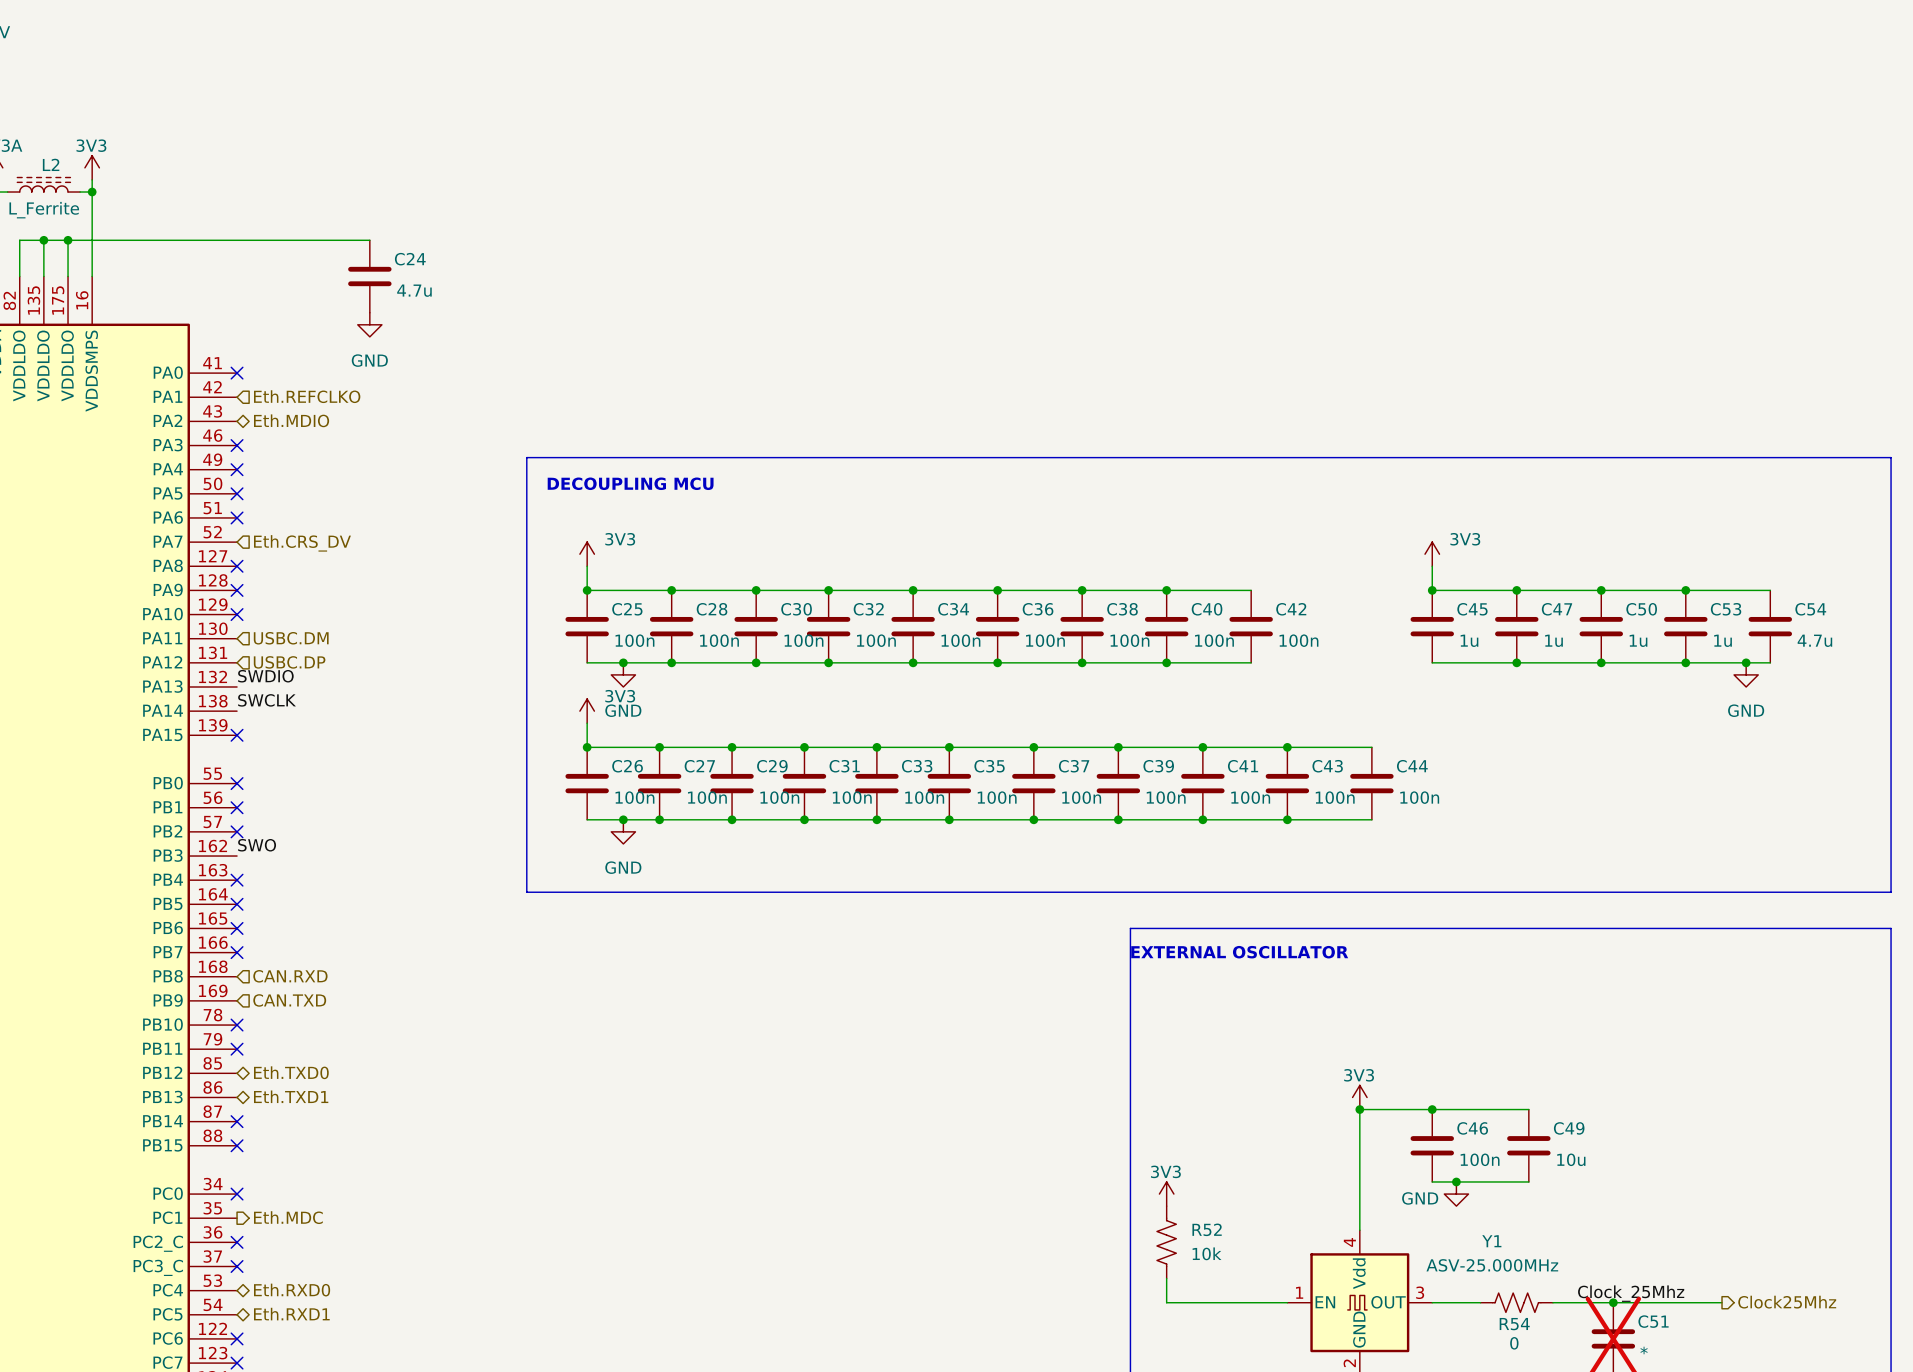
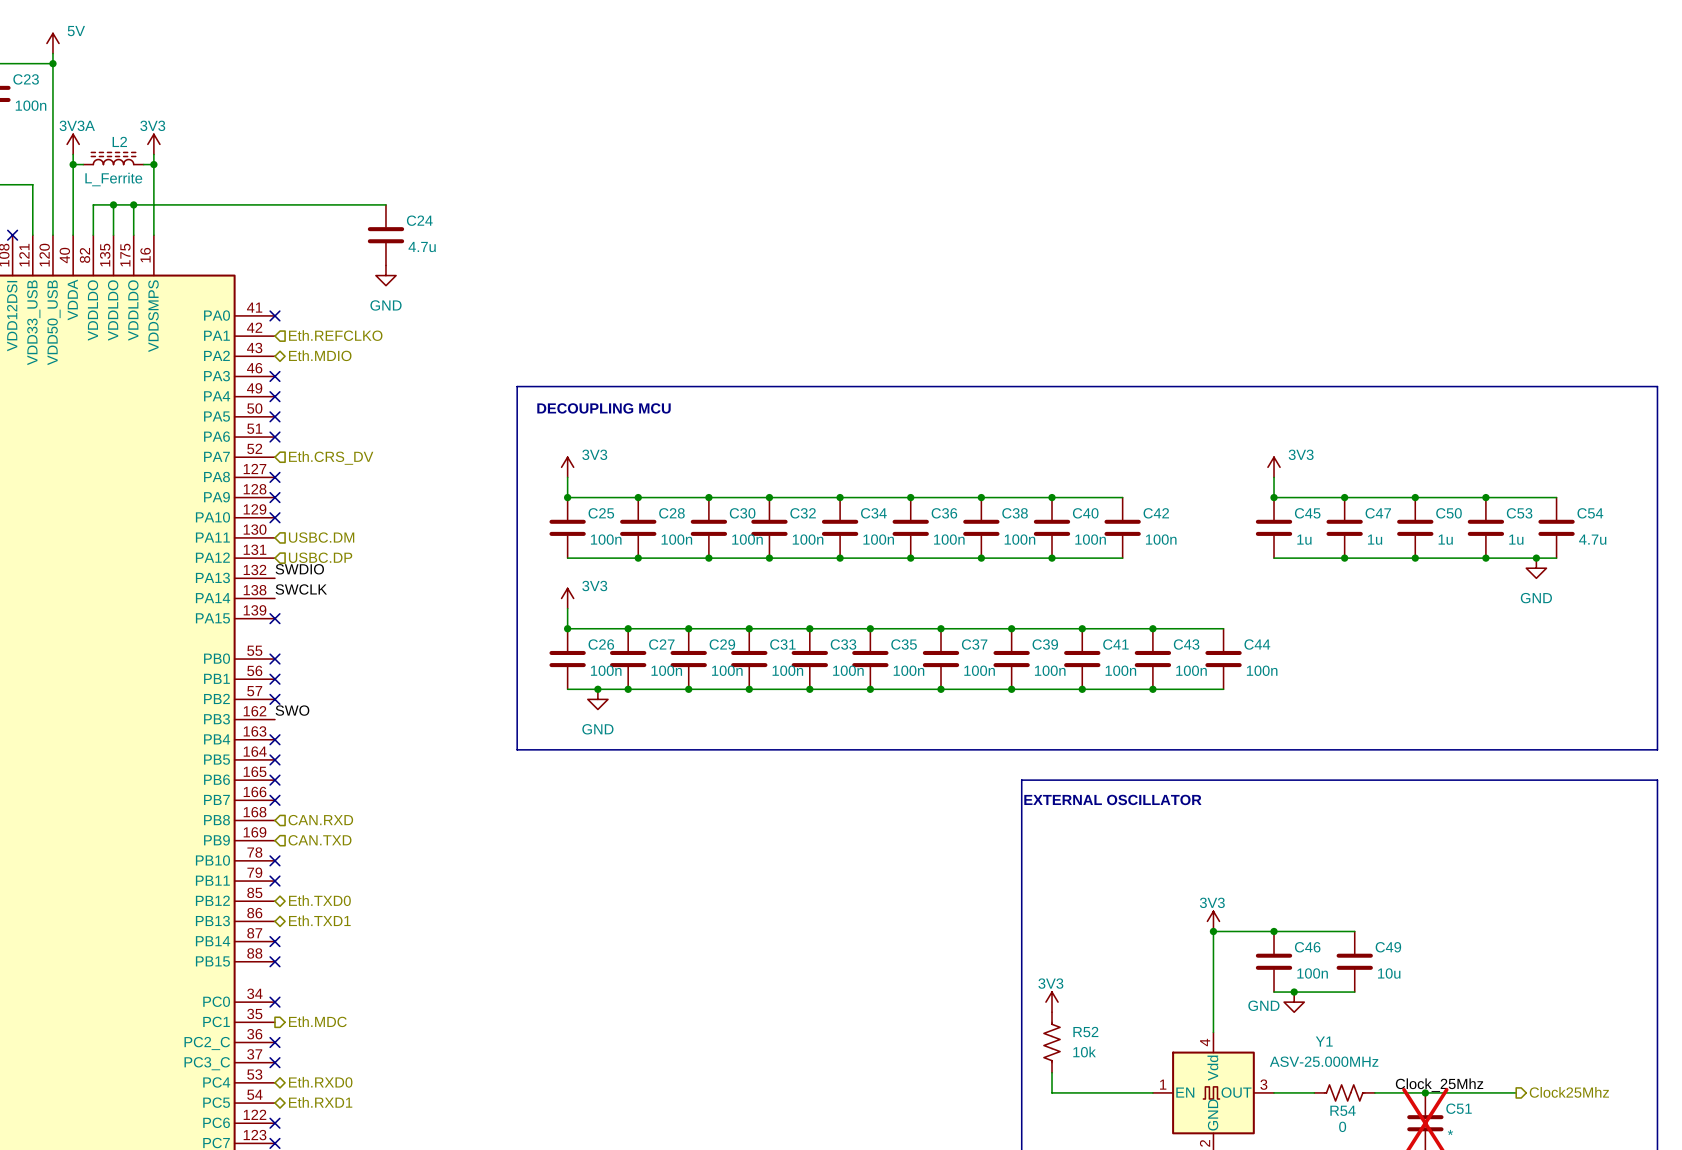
junction: (623, 662) -> none
power symbol: GND (623, 674) -> none

